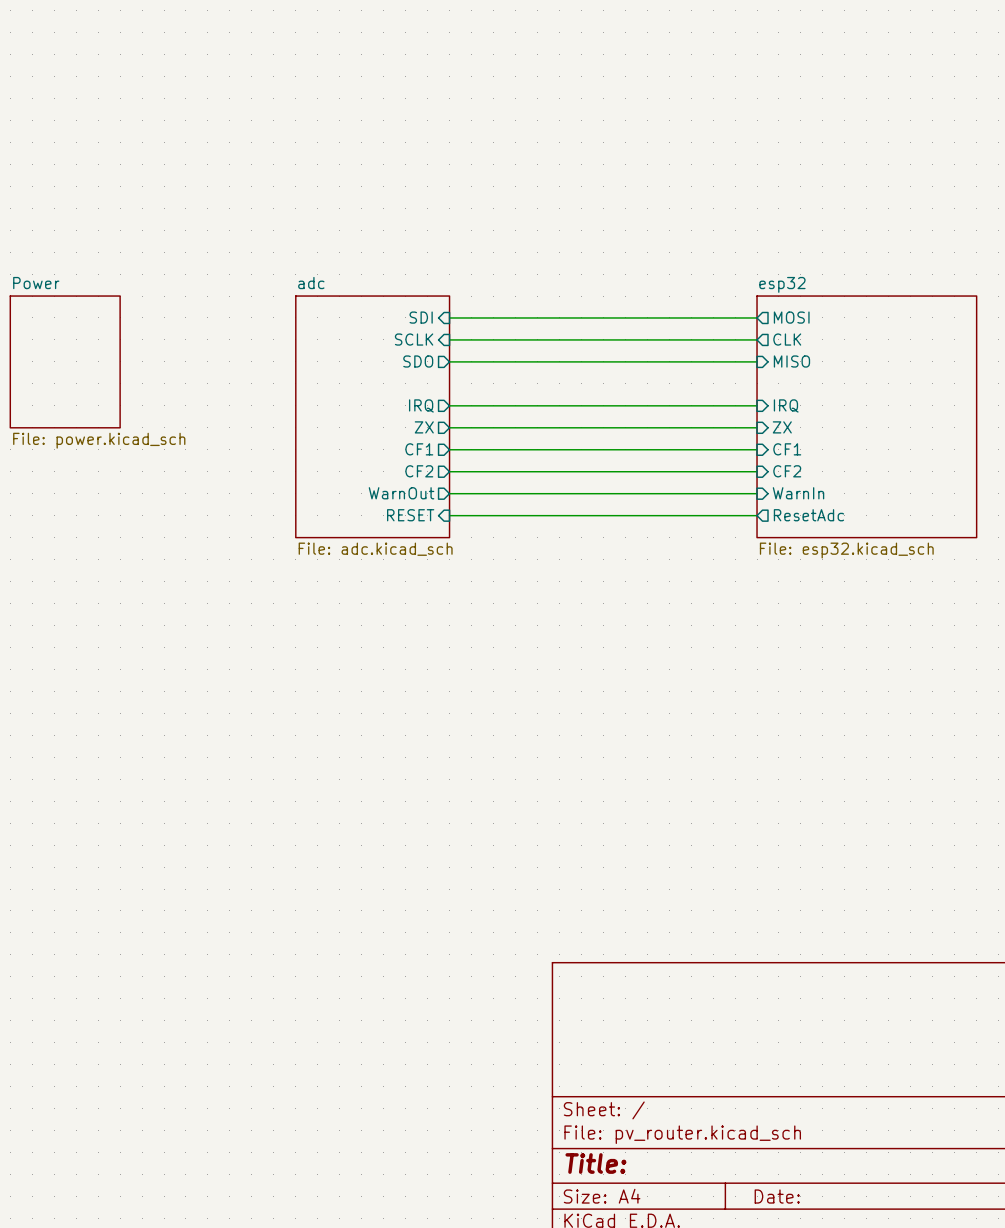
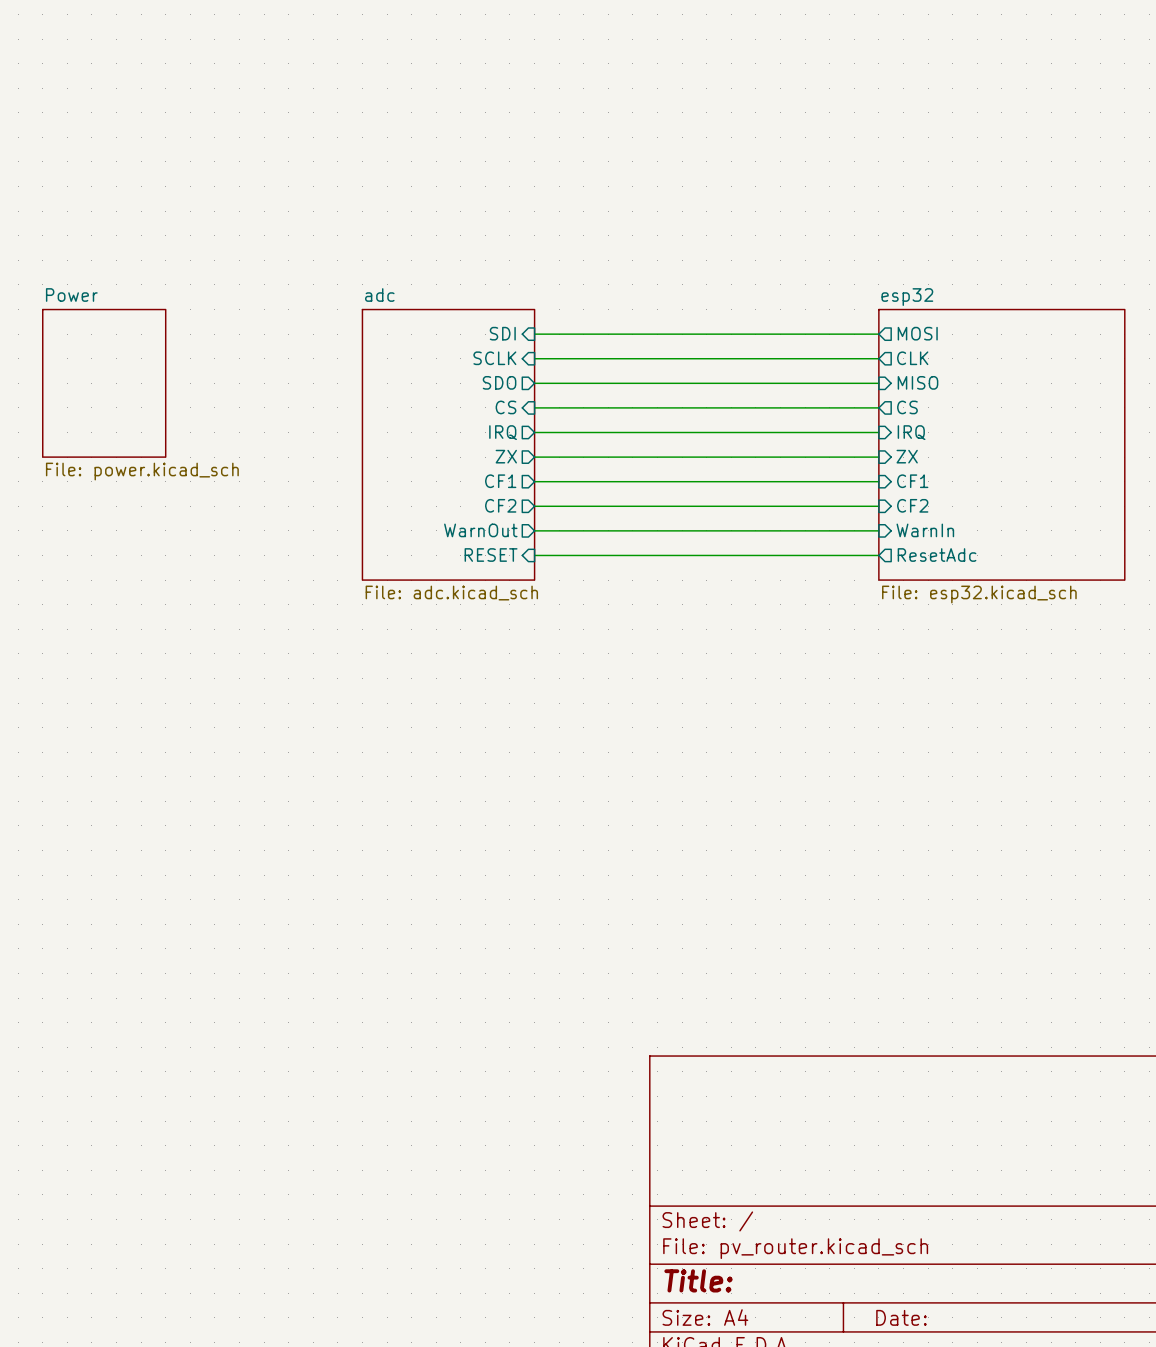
sheet pin: none -> CS (506, 407)
wire: none -> (534, 407) (878, 407)
sheet pin: none -> CS (907, 407)

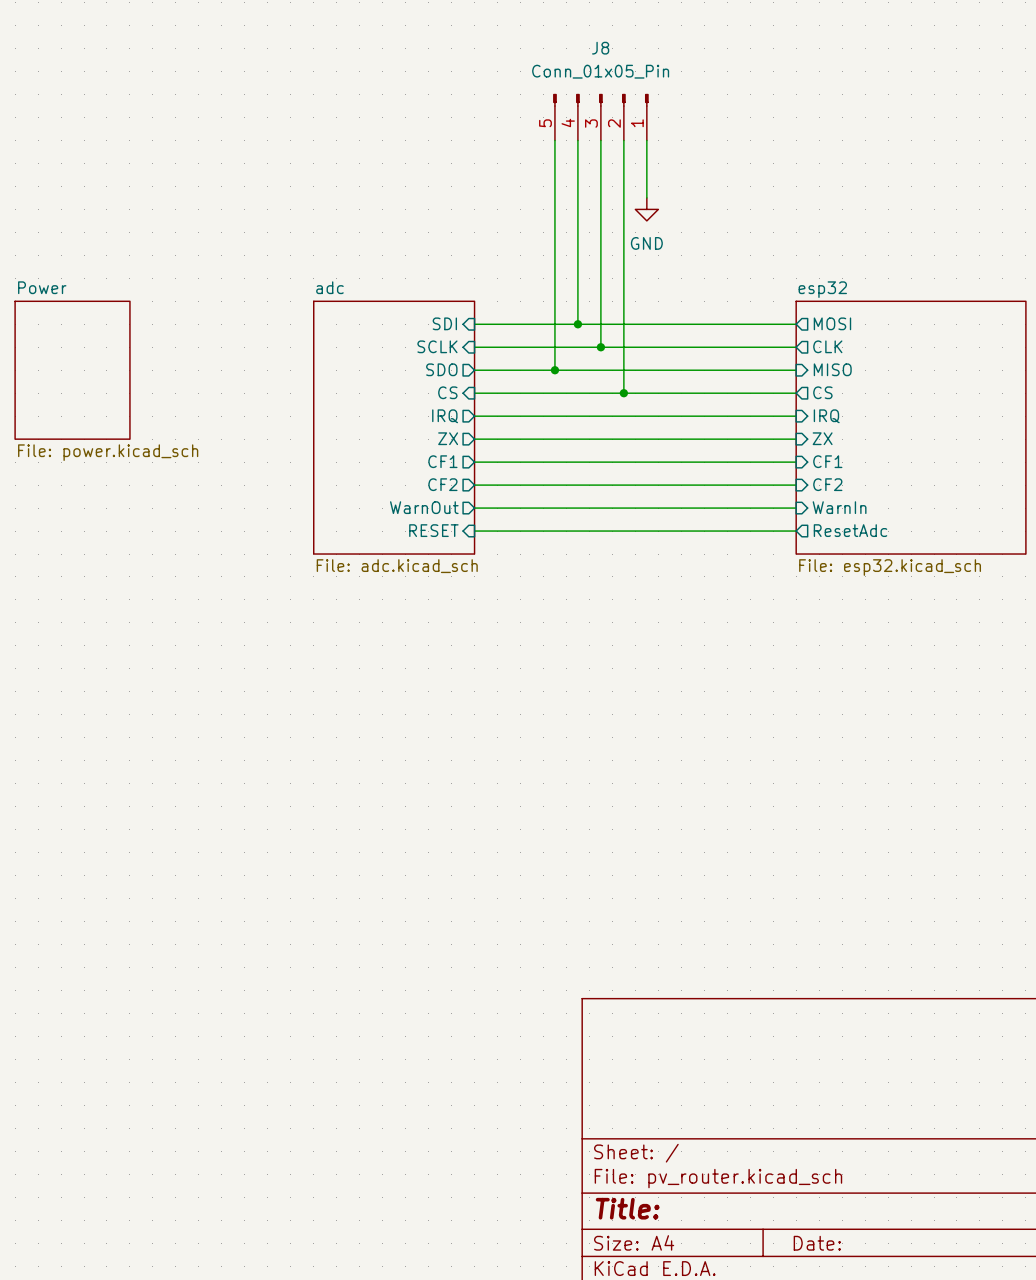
J8: none -> Conn_01x05_Pin (600, 117)
wire: none -> (554, 140) (554, 370)
wire: none -> (577, 140) (577, 324)
wire: none -> (600, 140) (600, 347)
wire: none -> (623, 140) (623, 393)
wire: none -> (646, 140) (646, 197)
power symbol: none -> GND (646, 209)
junction: none -> (577, 324)
junction: none -> (600, 347)
junction: none -> (554, 370)
junction: none -> (623, 393)

